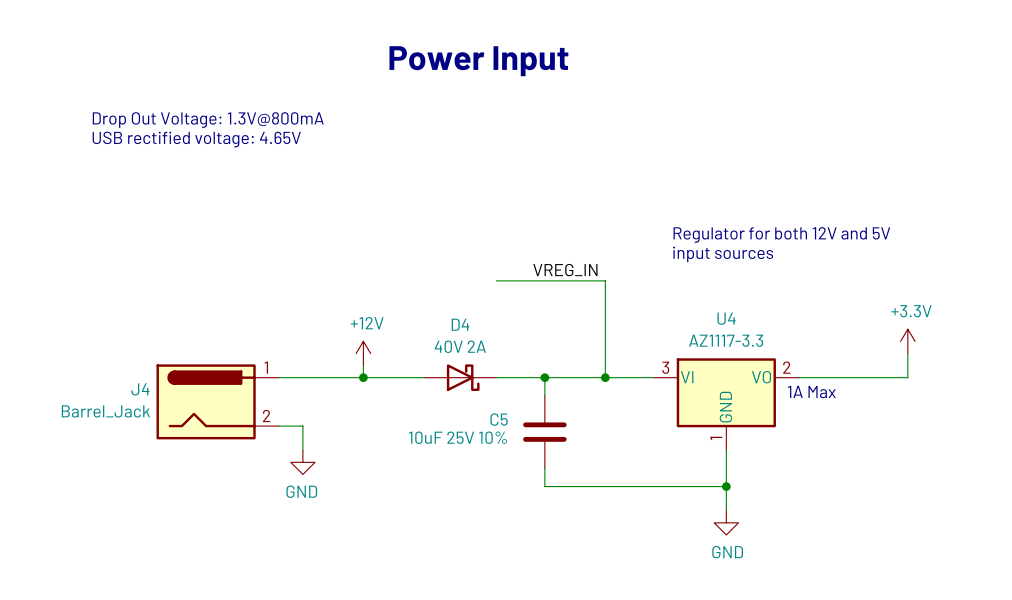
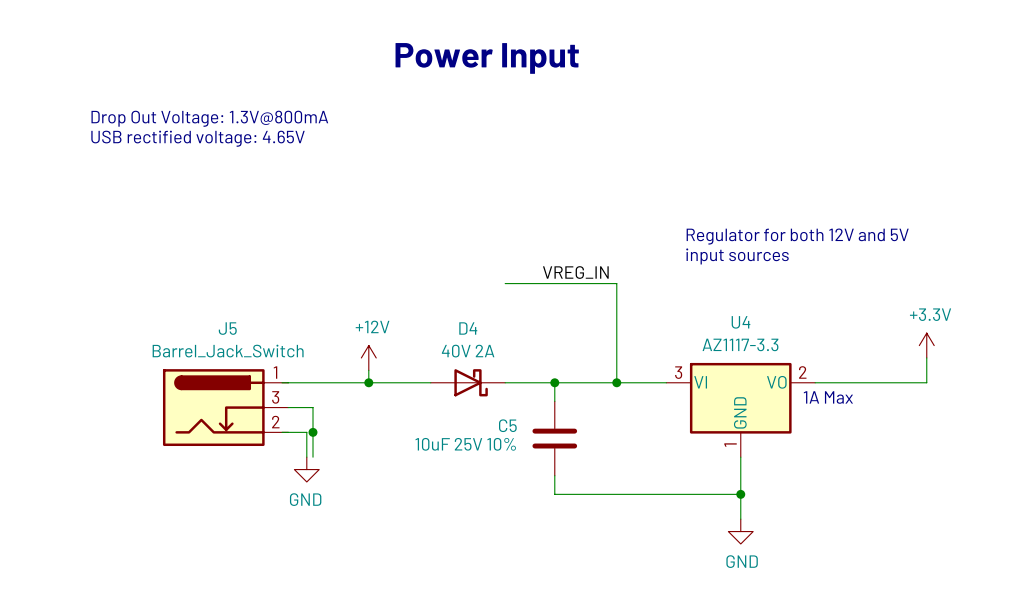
J4: Barrel_Jack (217, 401) -> none
J5: none -> Barrel_Jack_Switch (225, 407)
wire: none -> (288, 407) (313, 407) (313, 457)
junction: none -> (313, 432)

